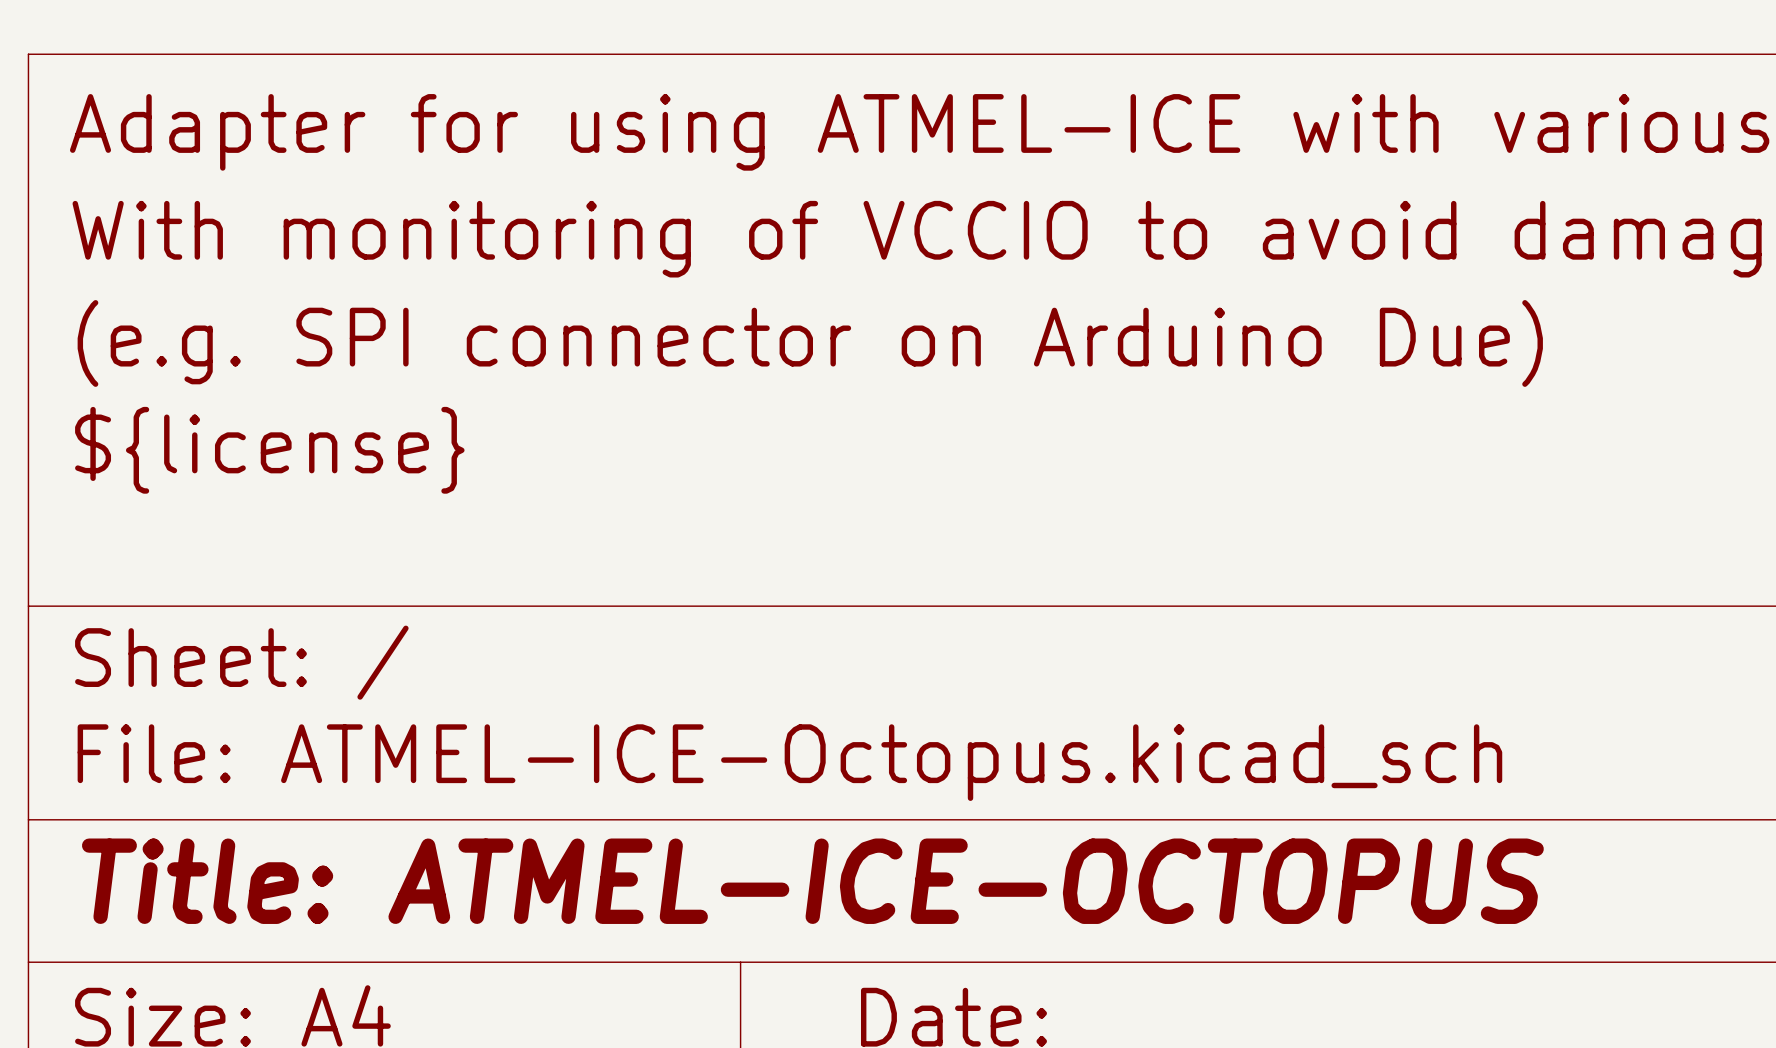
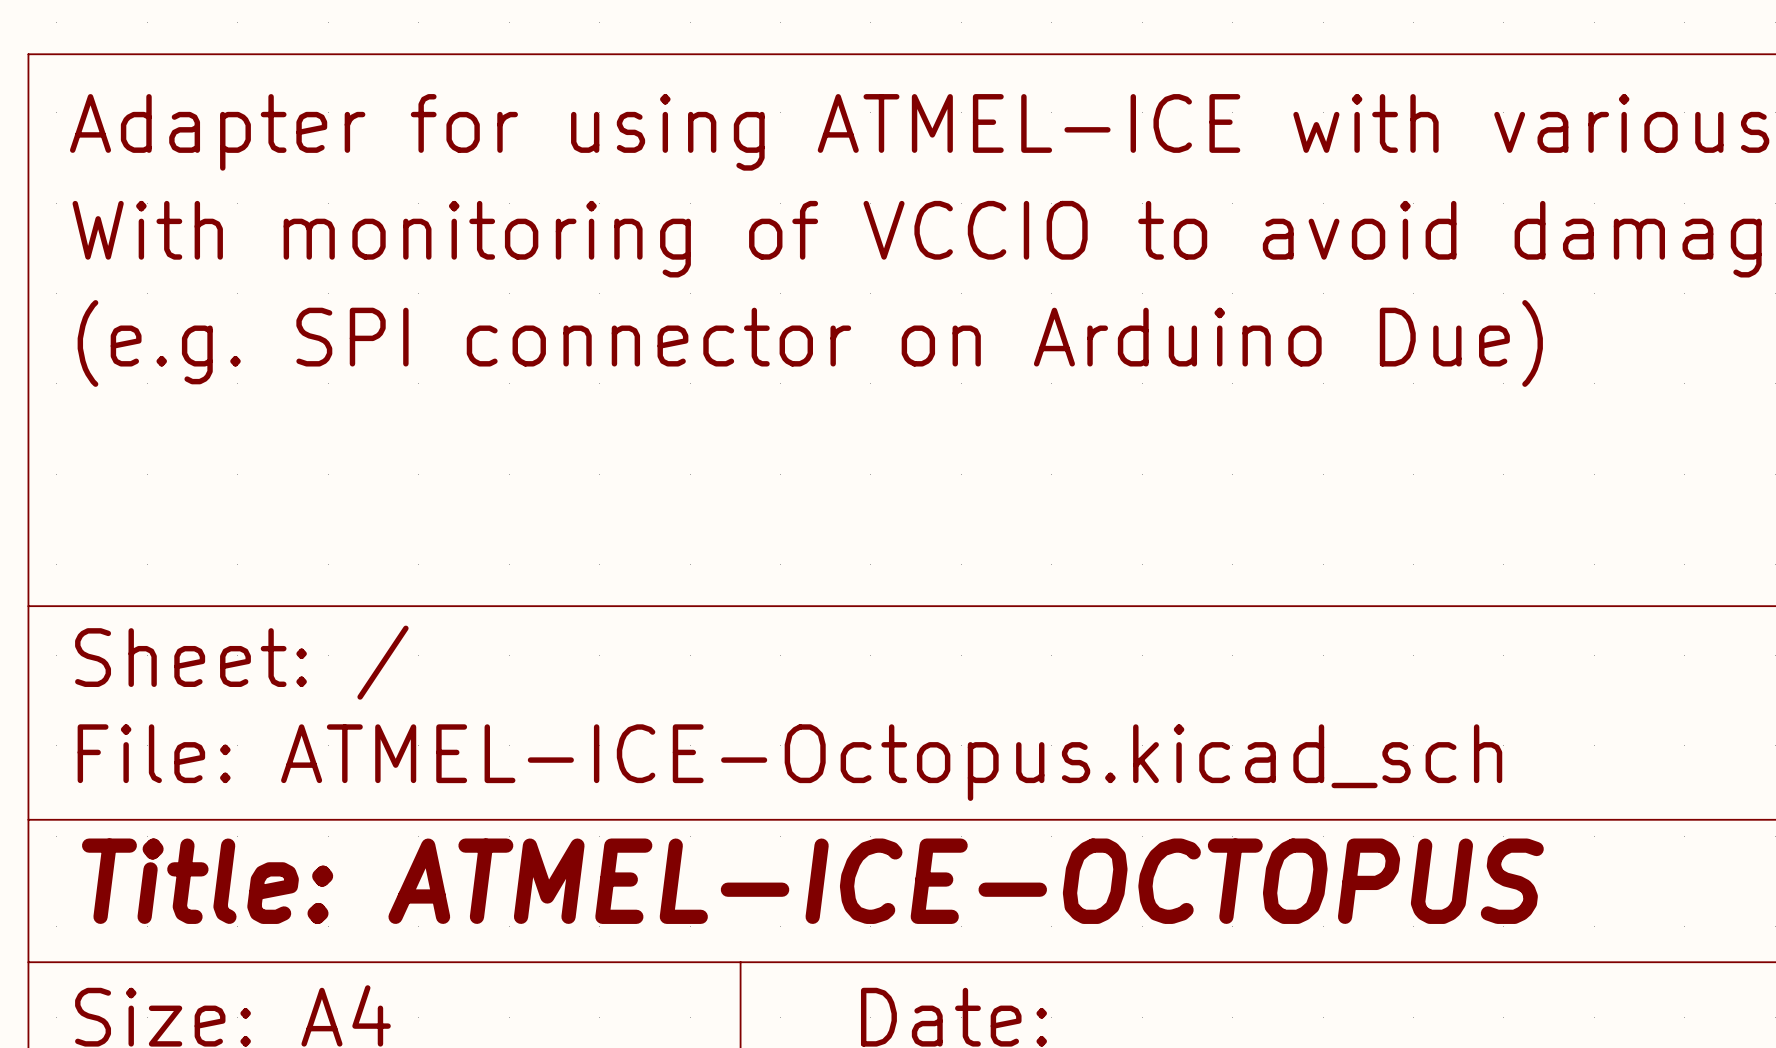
title block: ${license} (269, 450) -> none

